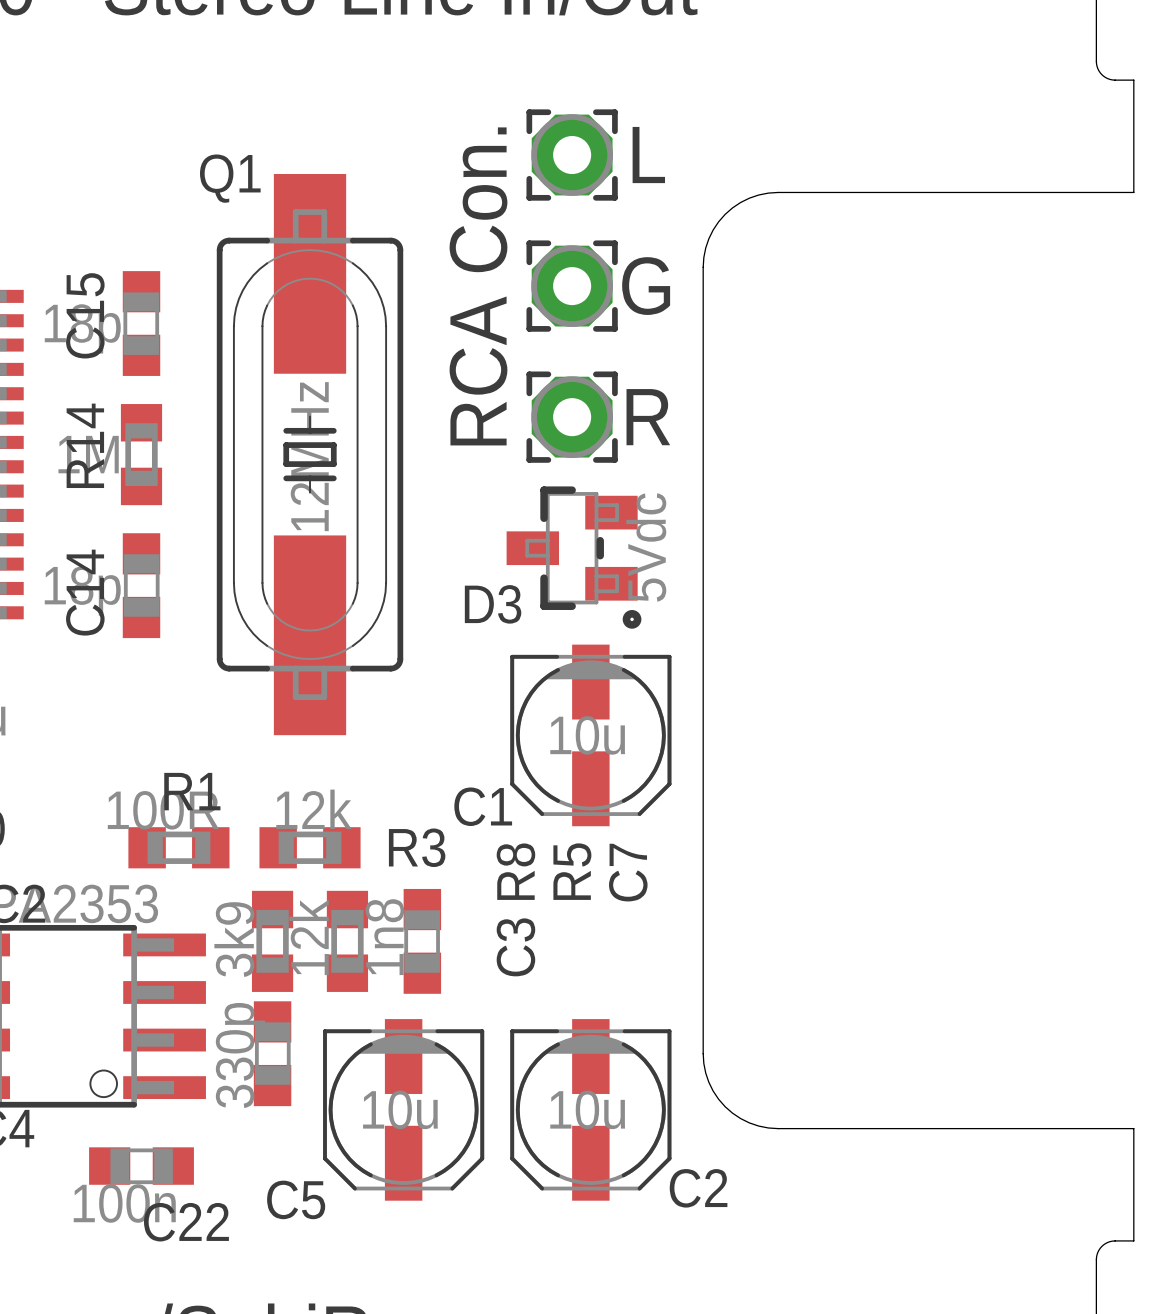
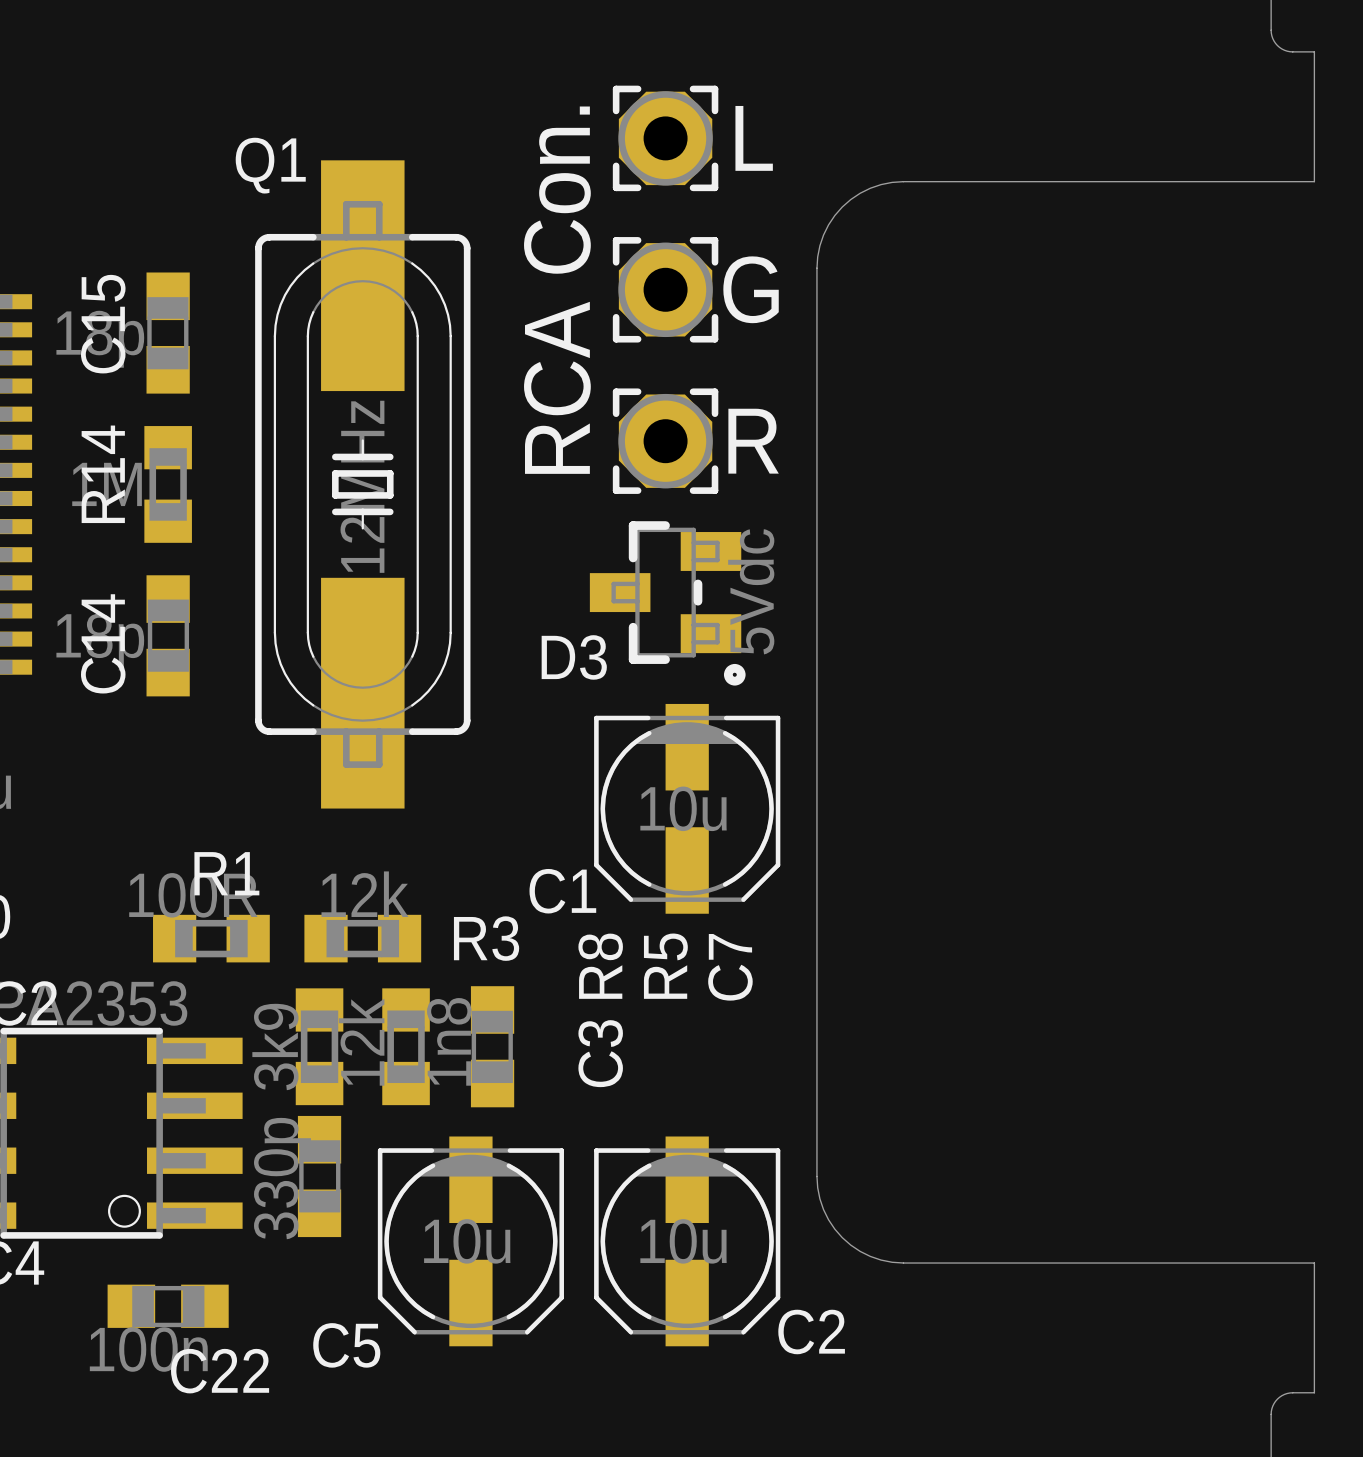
R3 value position: 12k (313, 809) -> 12k (364, 894)
R8 value position: 3k9 (234, 939) -> 3k9 (275, 1047)

